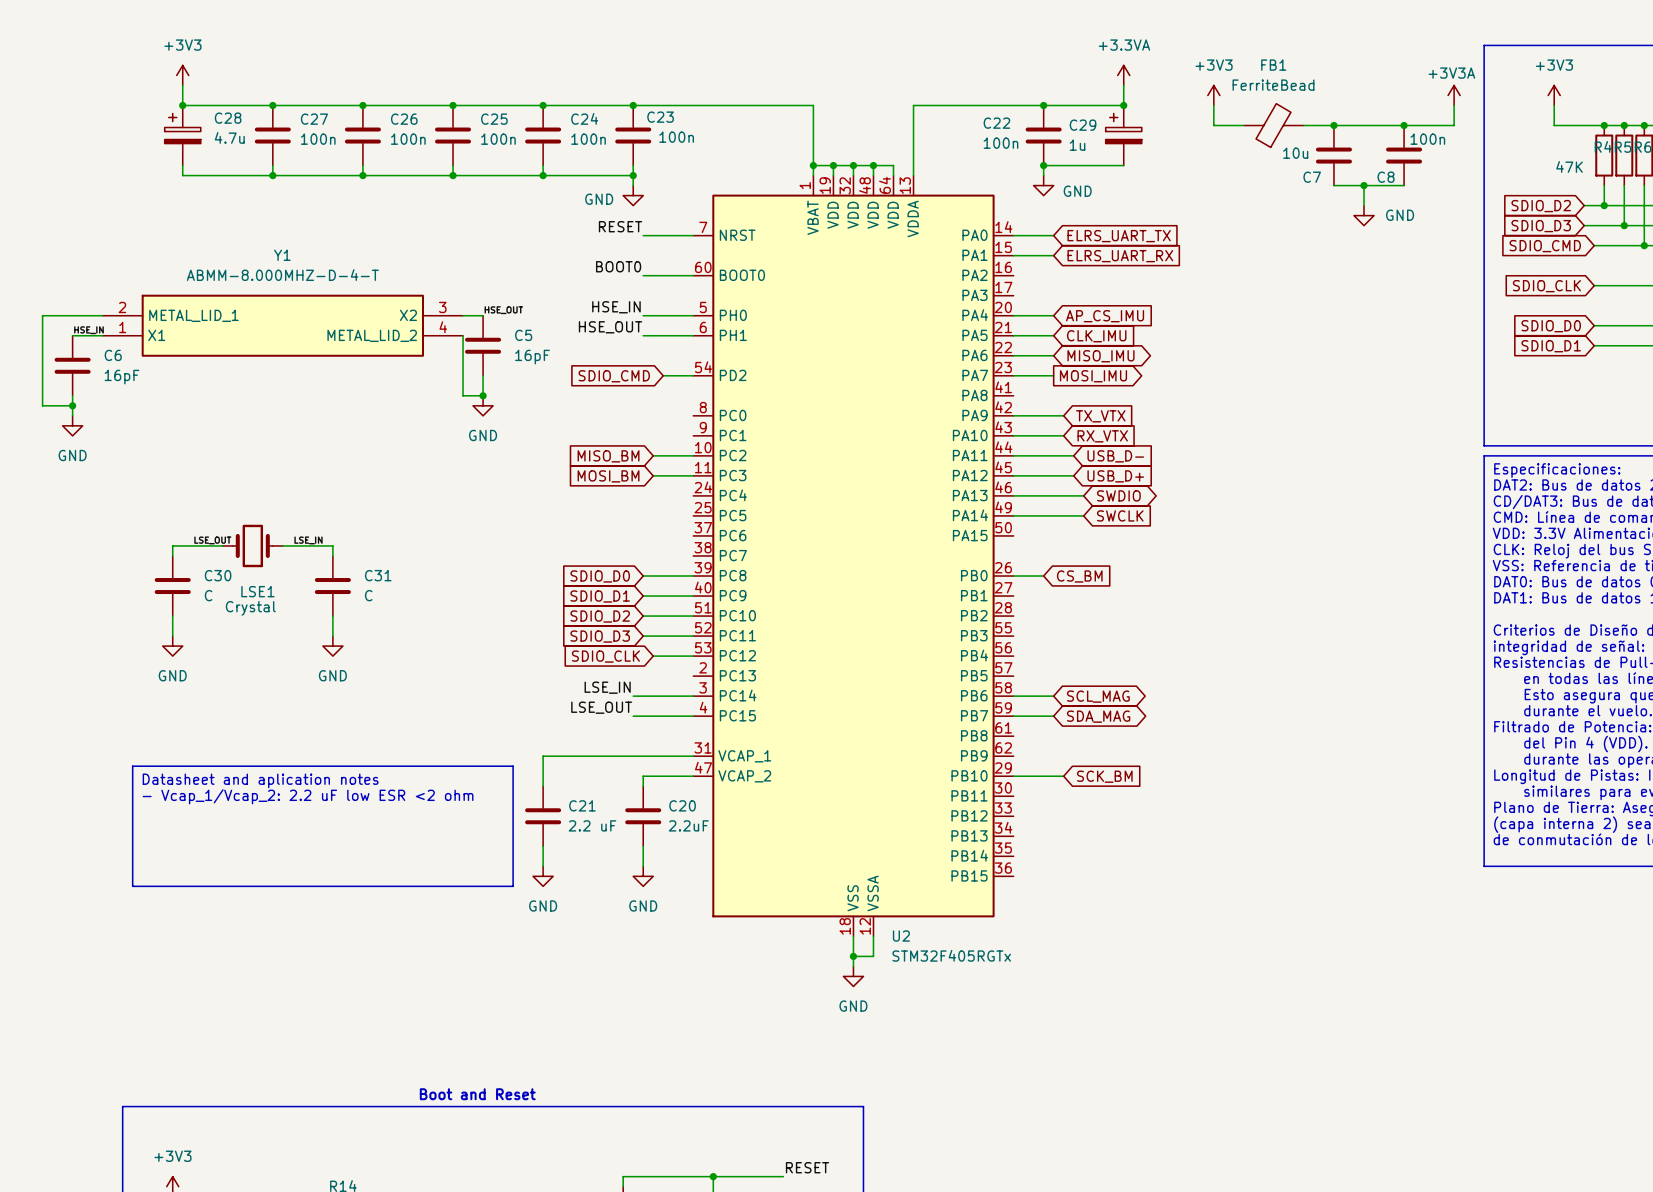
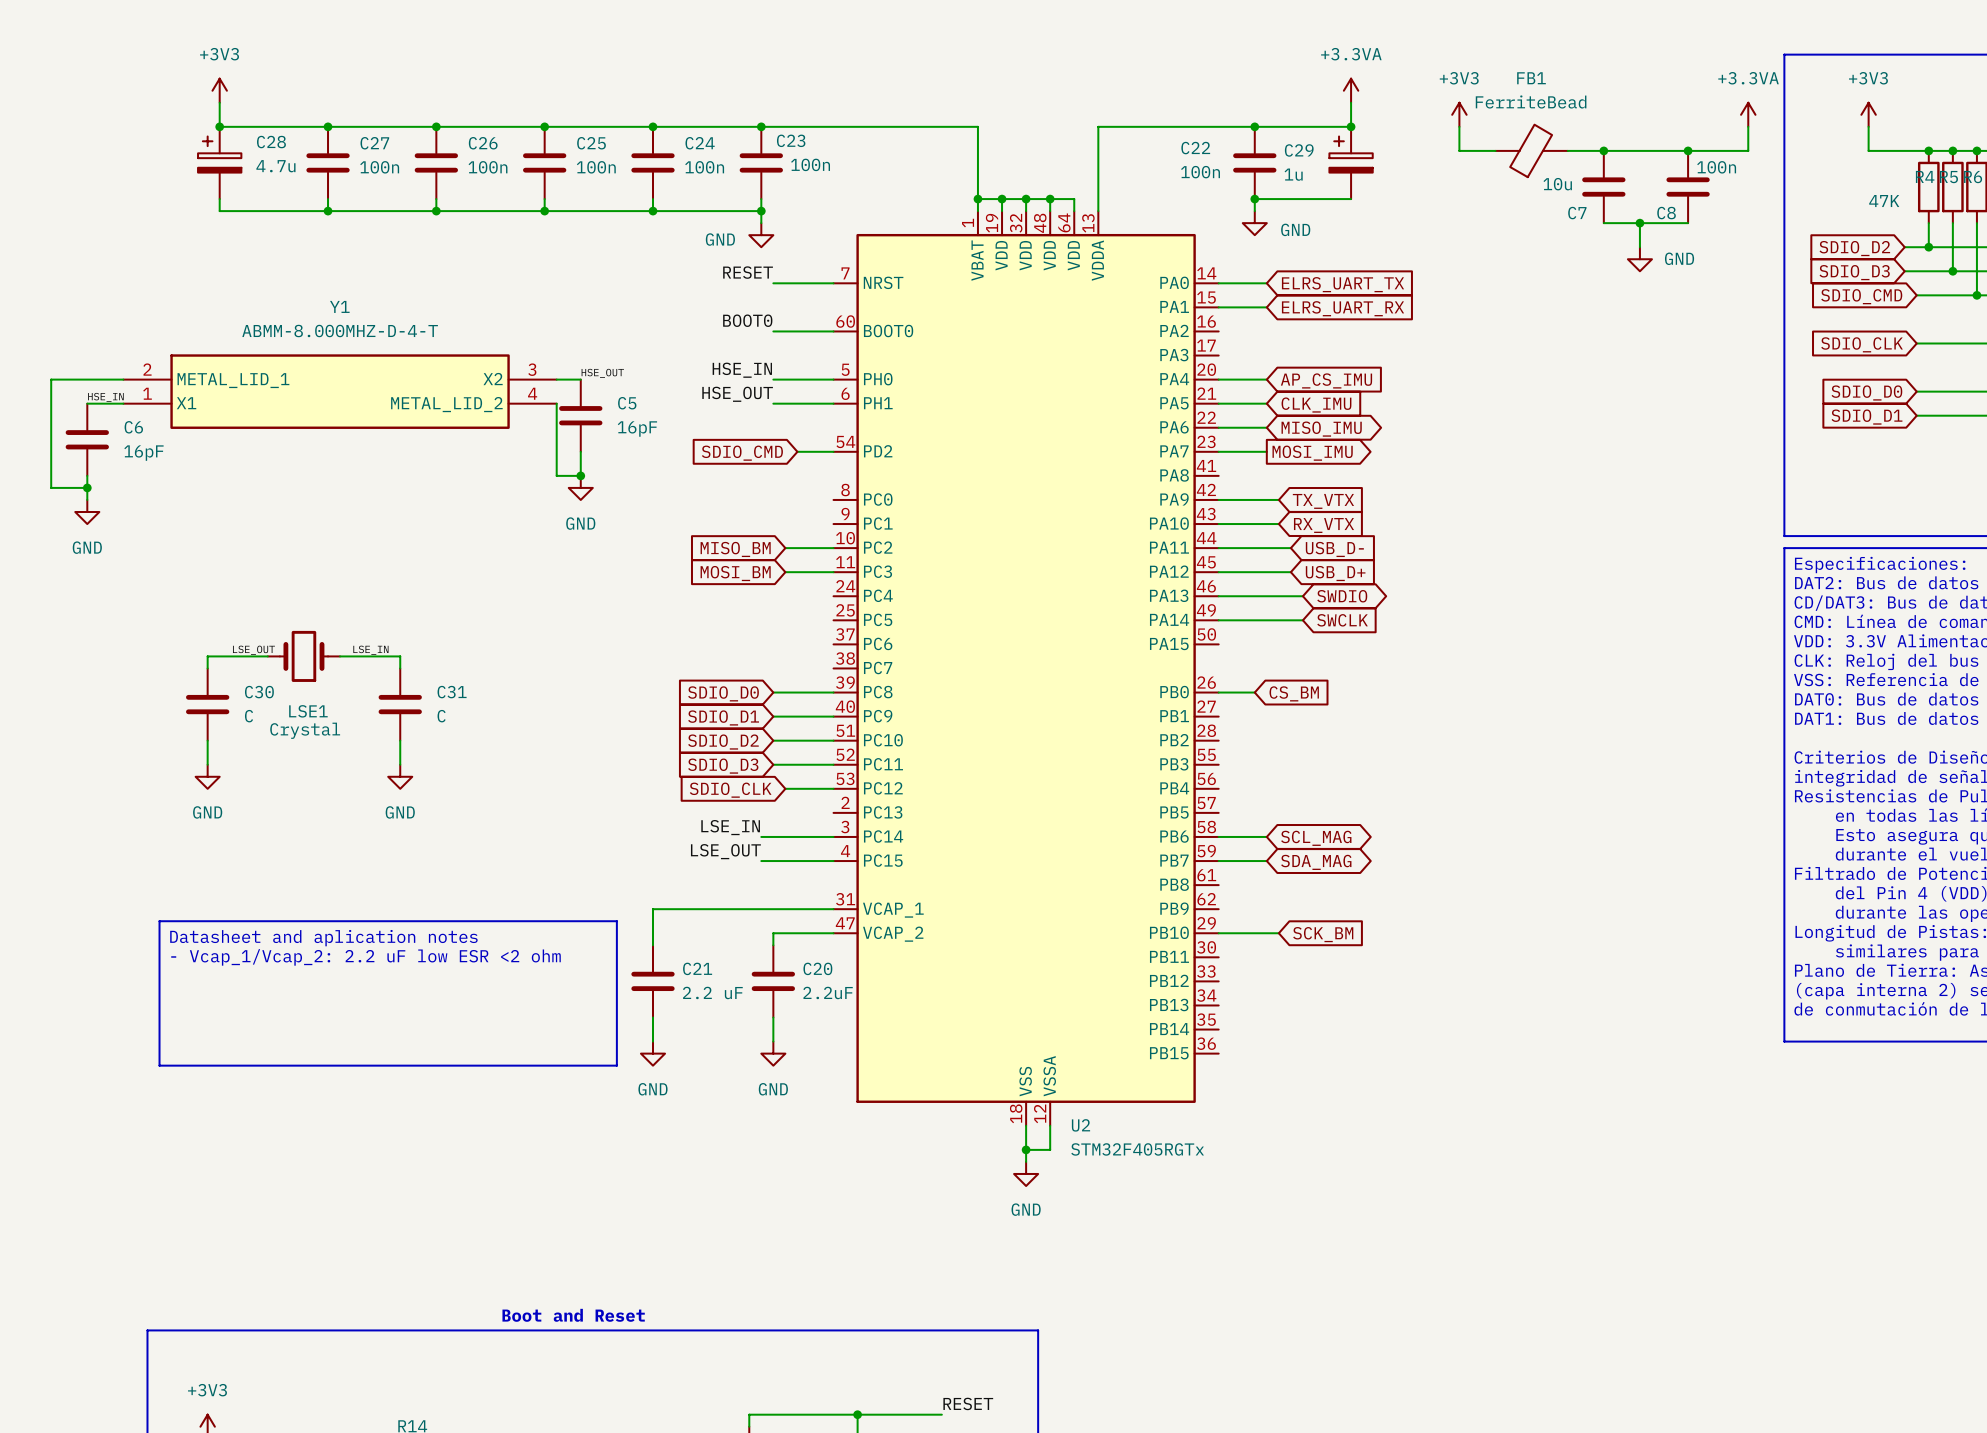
power symbol: +3V3A (1454, 95) -> +3.3VA (1748, 114)

